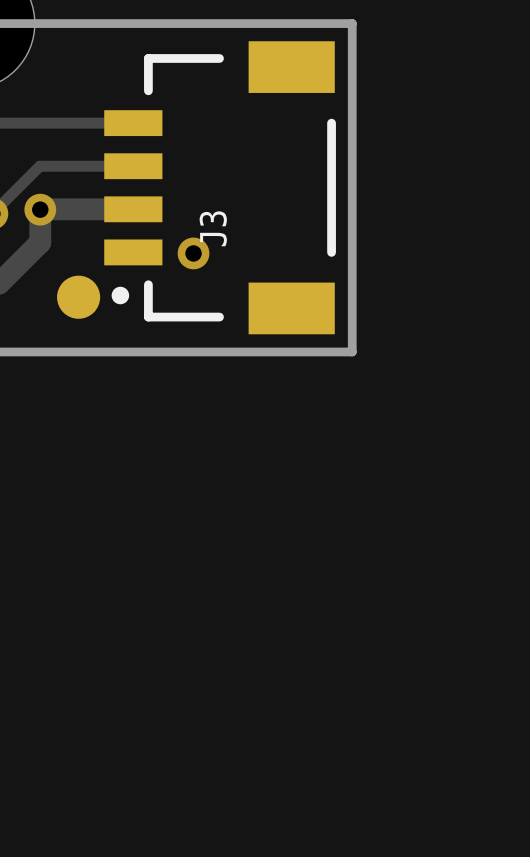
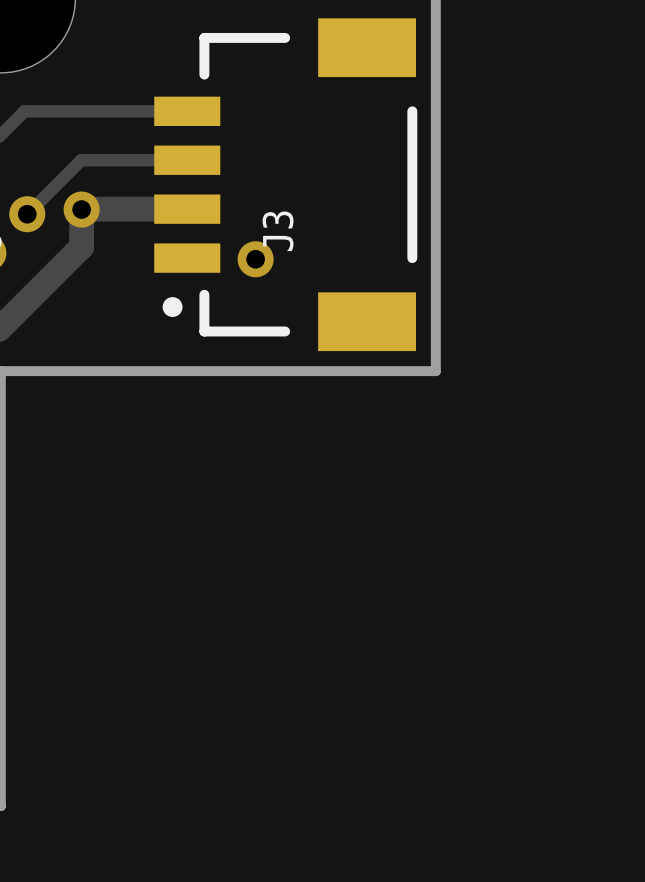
part: (78, 297) -> none

